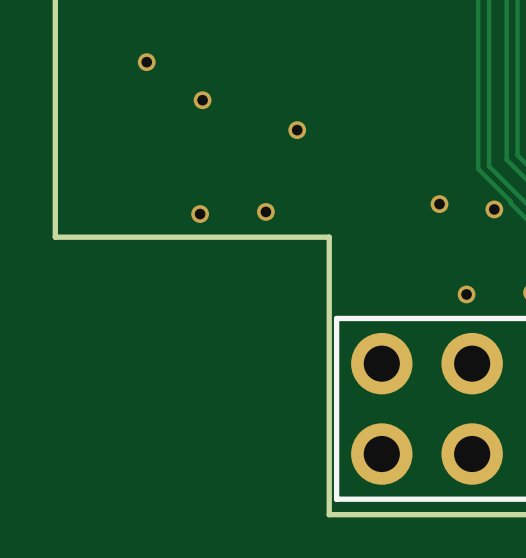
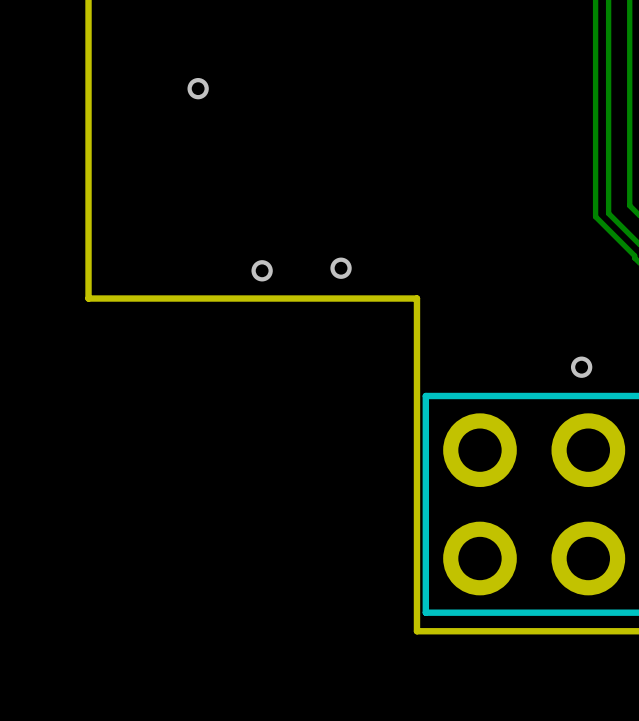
via: (202, 100) -> none
via: (297, 130) -> none
via: (439, 204) -> none
via: (494, 209) -> none

